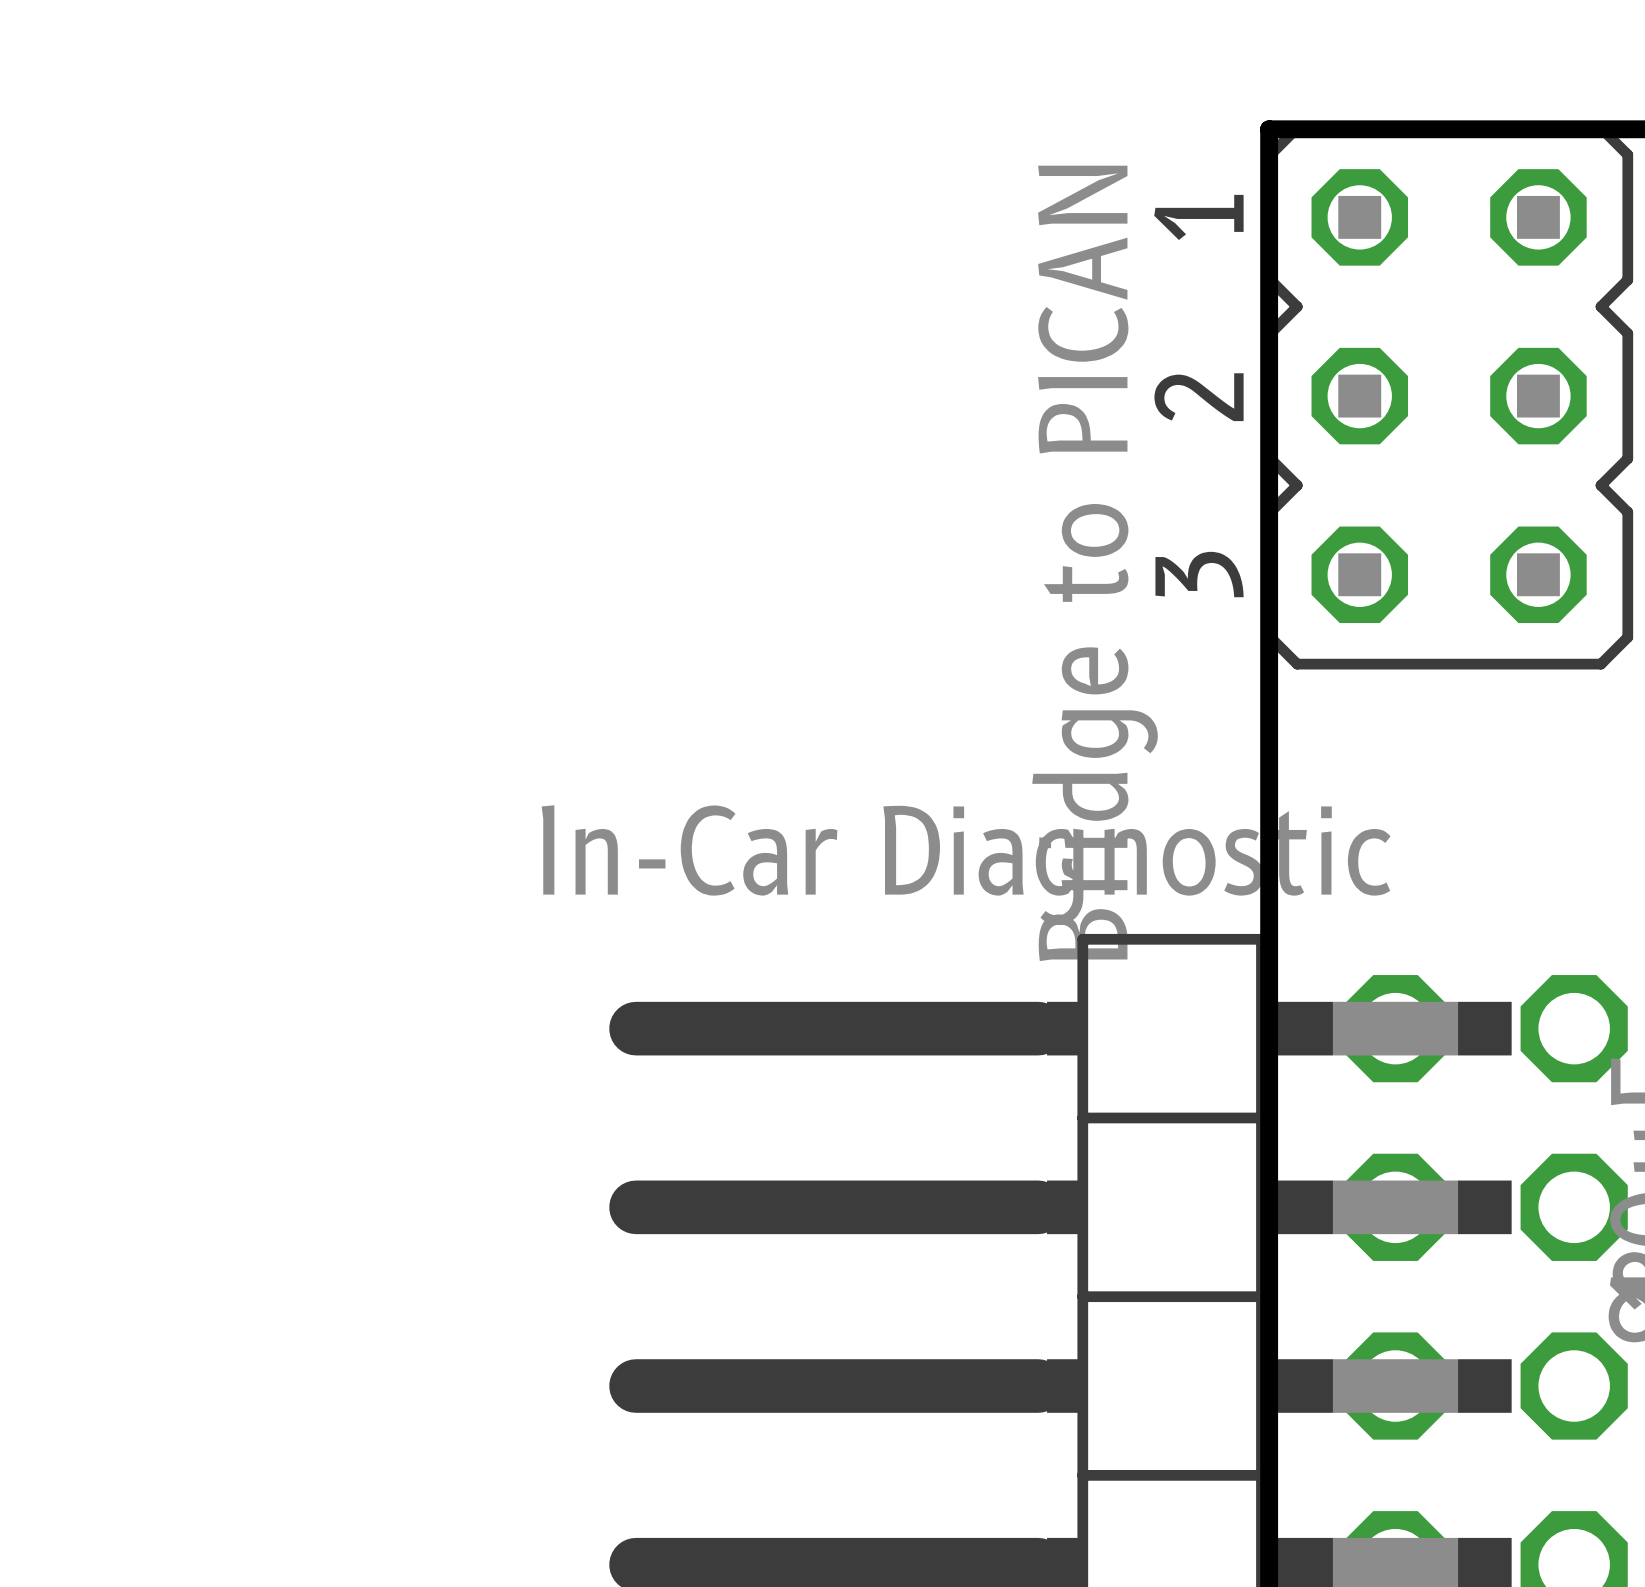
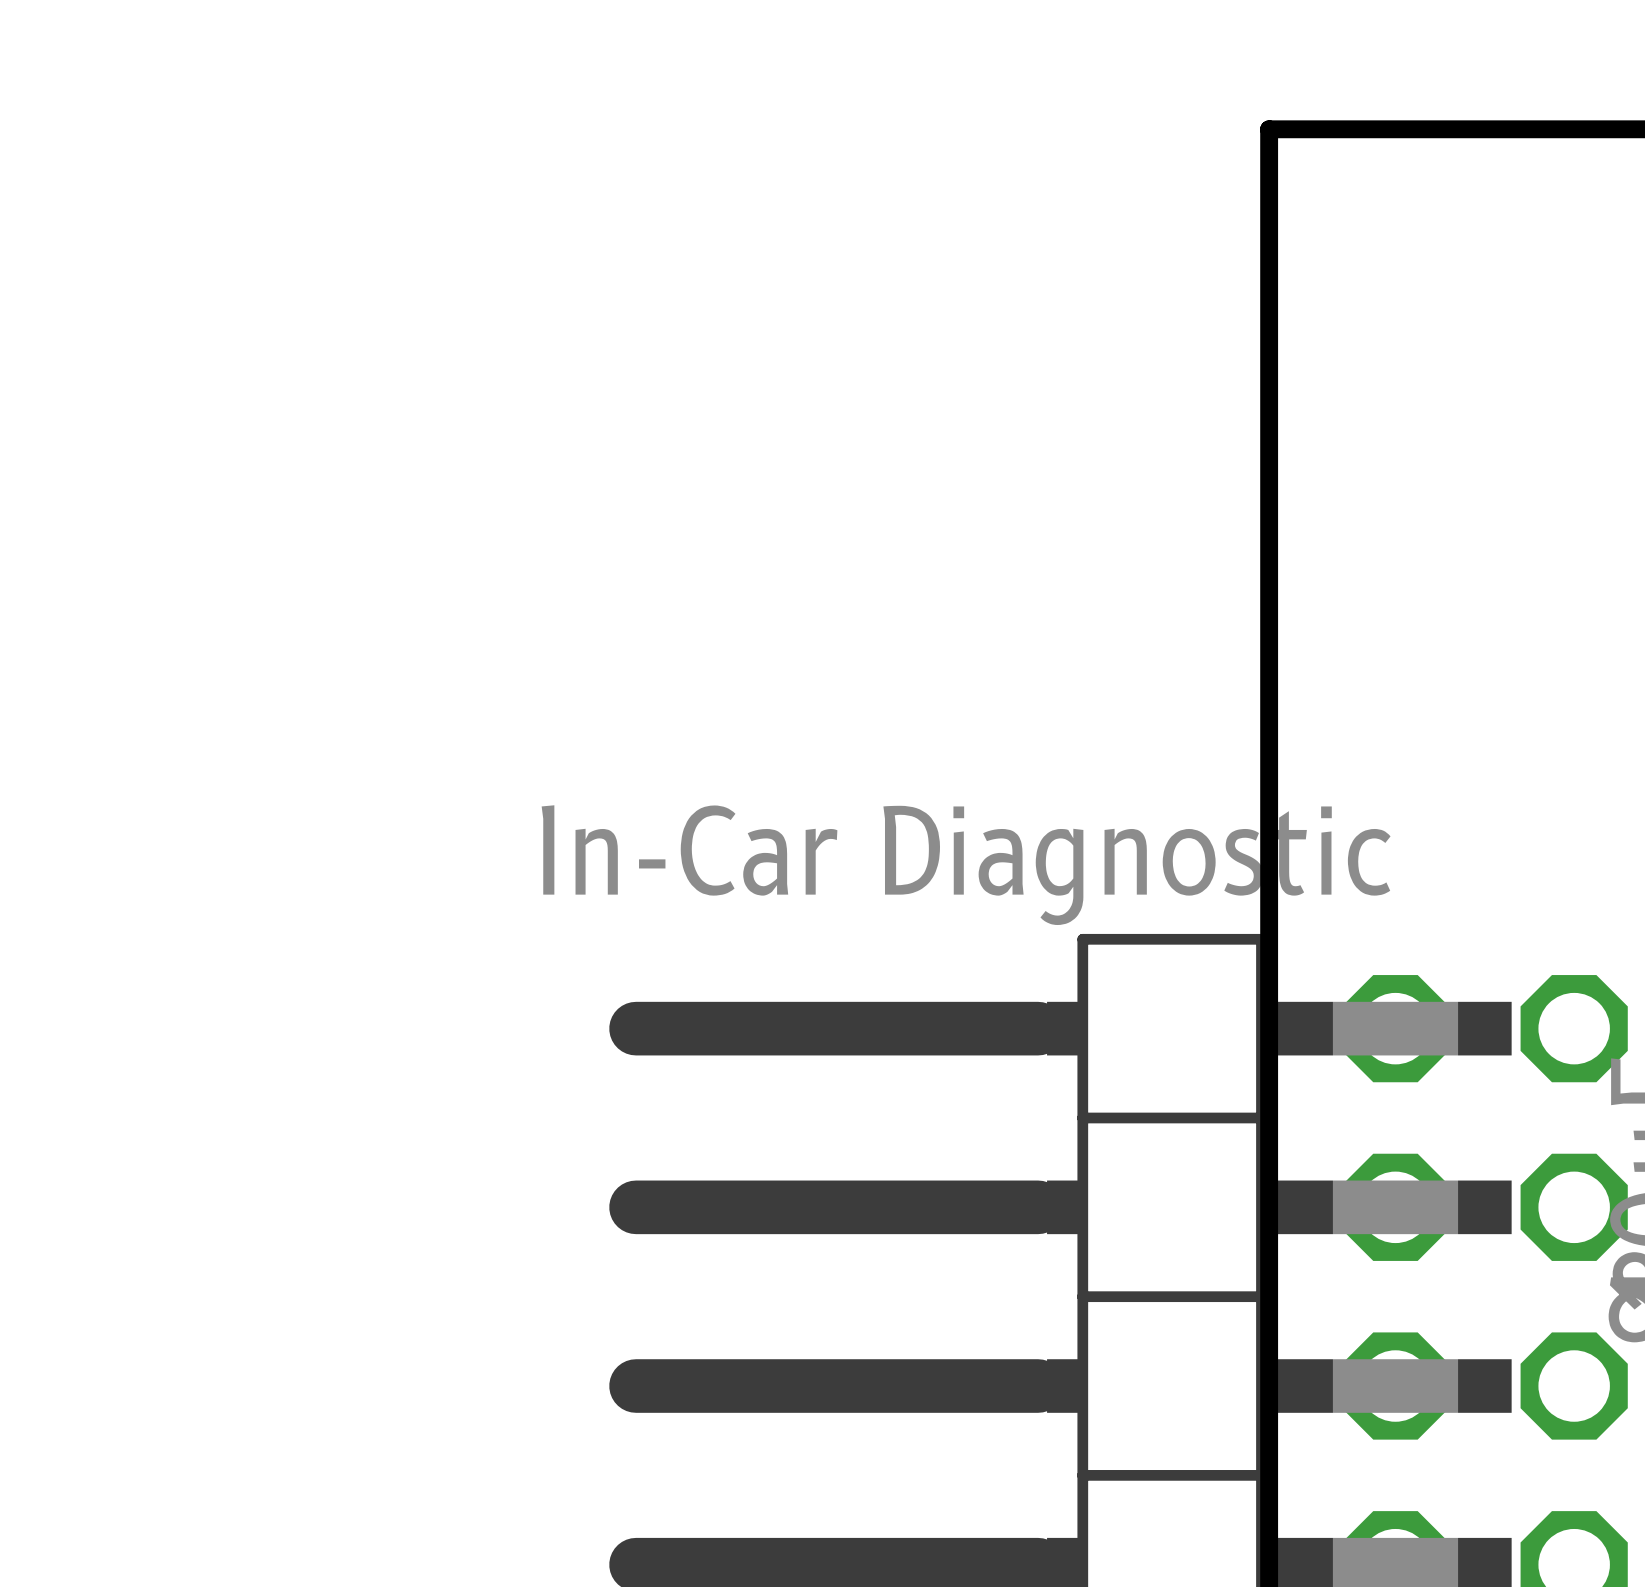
part: Bridge to PICAN (1449, 396) -> none

